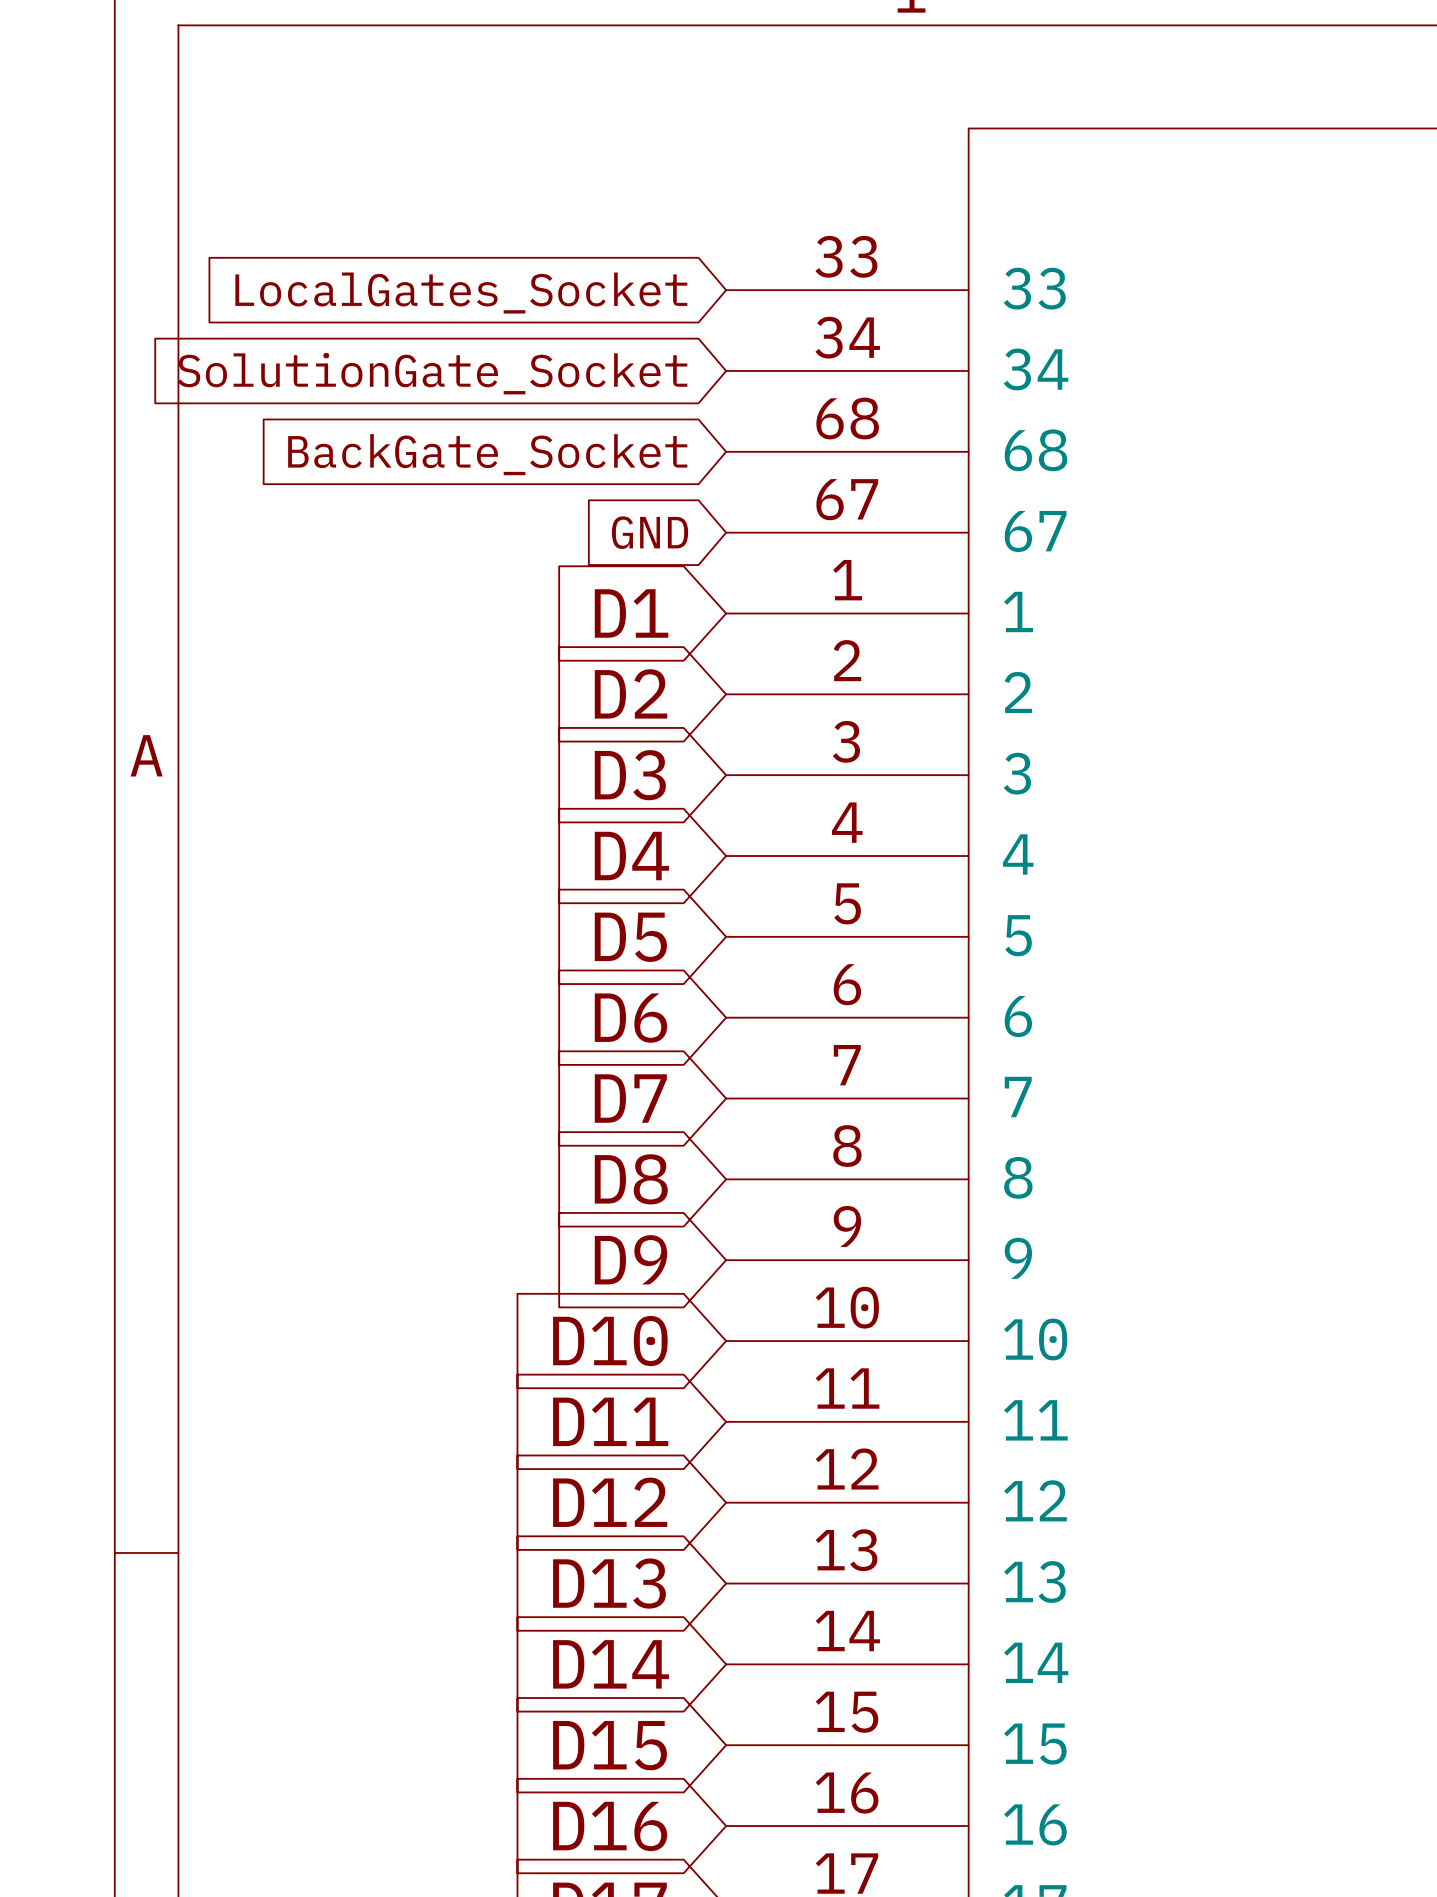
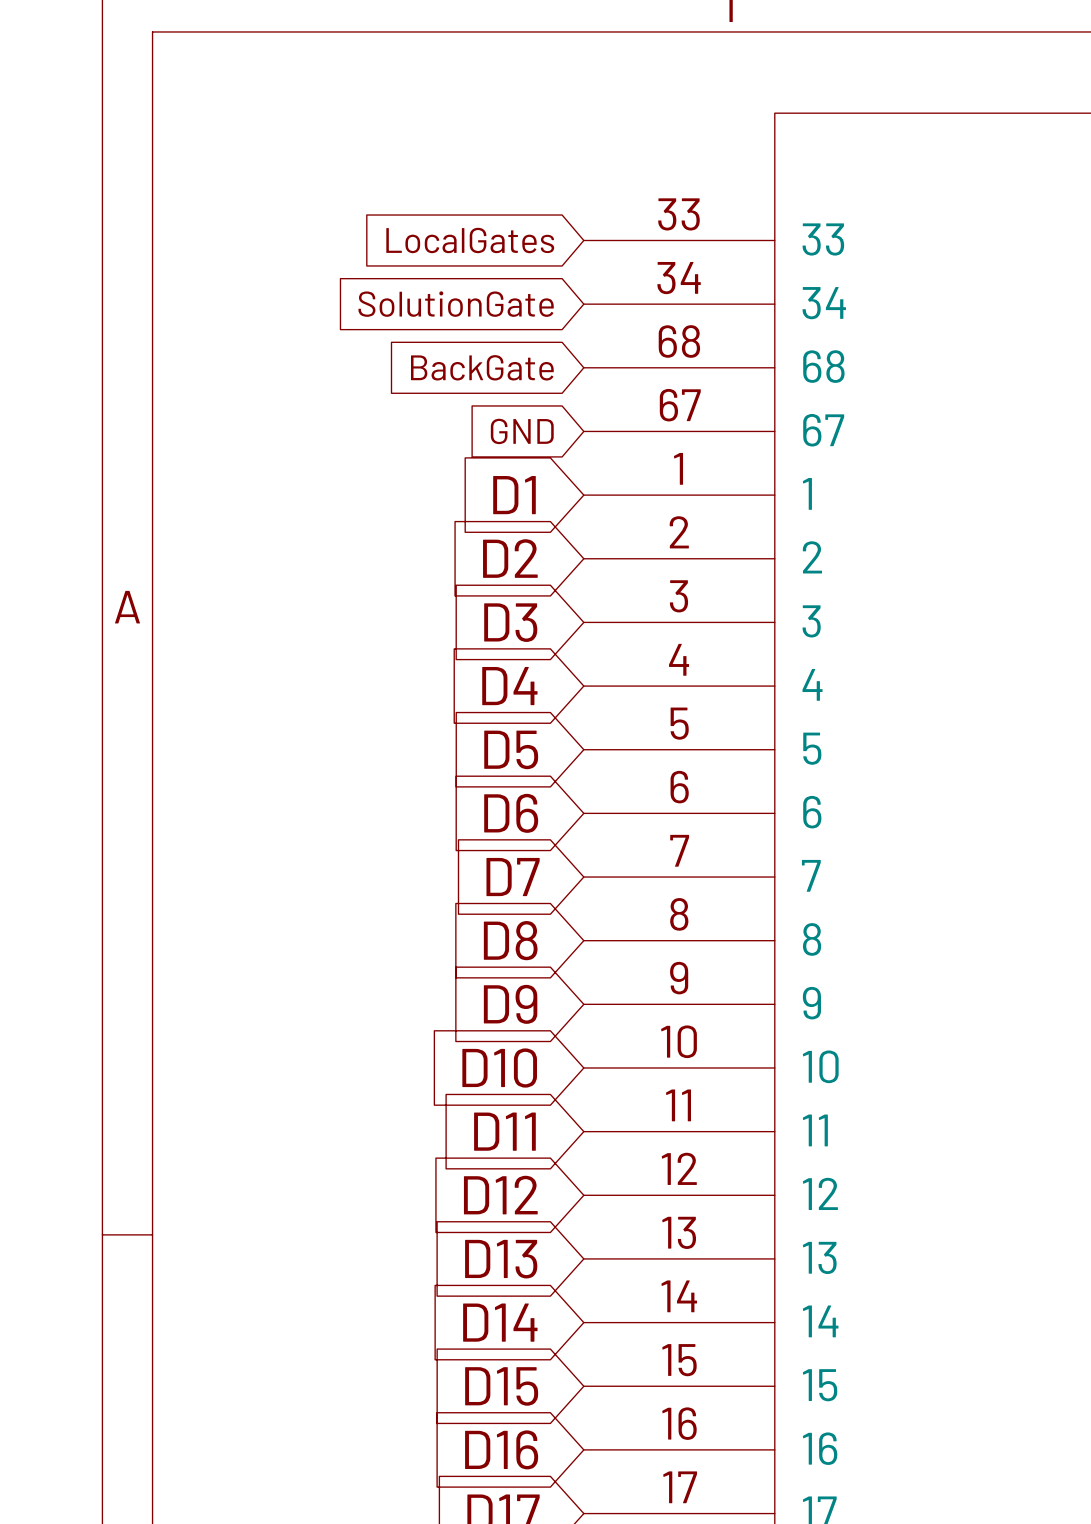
global label: LocalGates_Socket (461, 293) -> LocalGates (470, 240)
global label: SolutionGate_Socket (432, 373) -> SolutionGate (456, 304)
global label: BackGate_Socket (487, 454) -> BackGate (482, 367)

